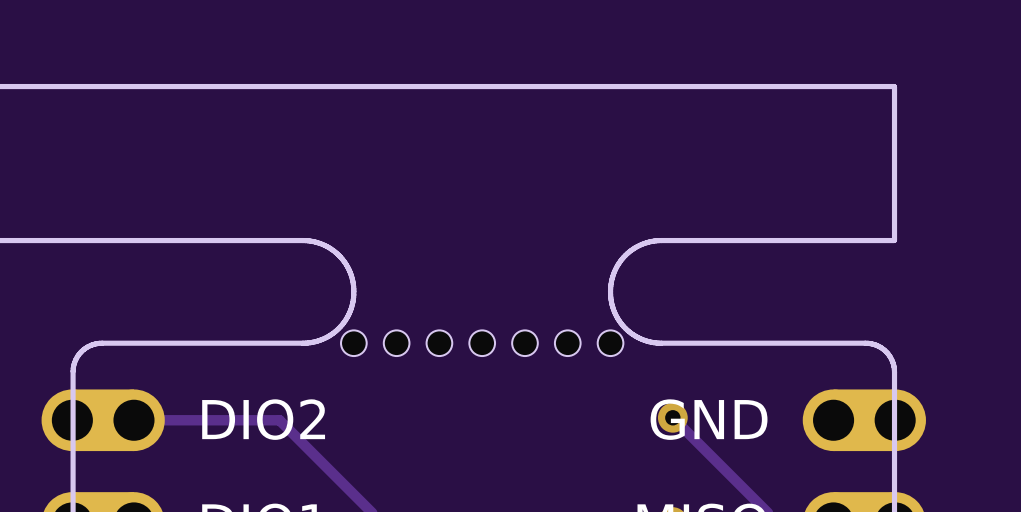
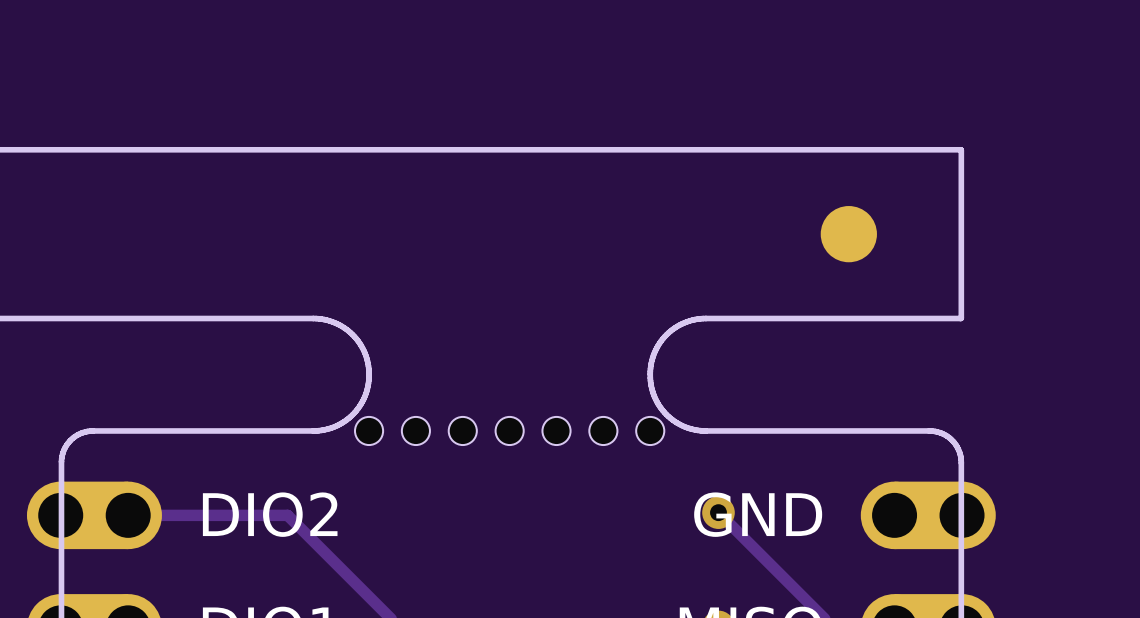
part: none -> (848, 234)

